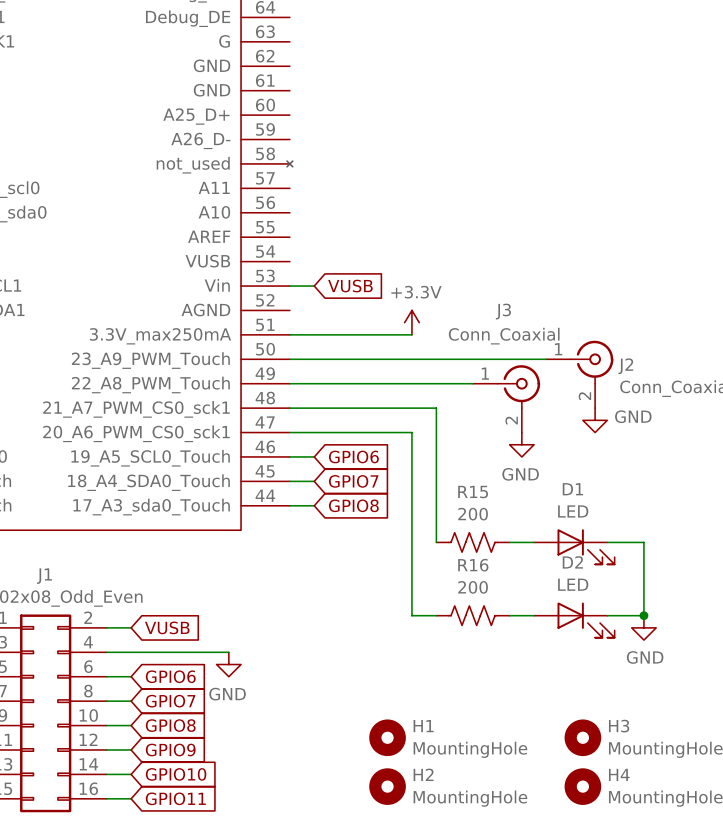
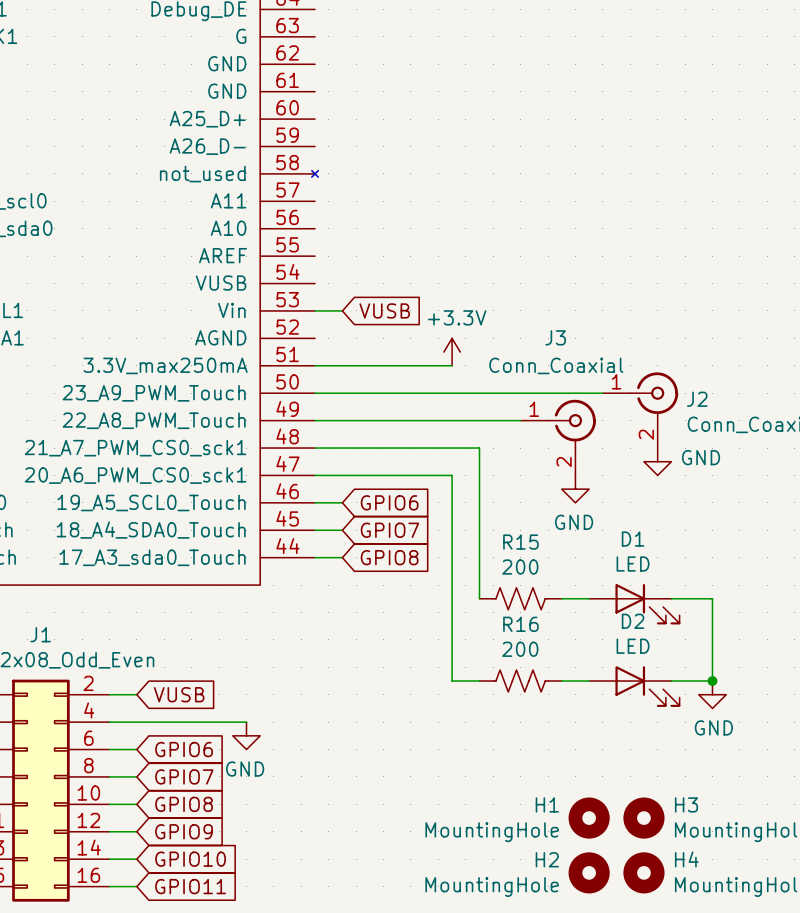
H1 name position: H1 (423, 726) -> H1 (547, 804)
H1 position: (387, 737) -> (589, 818)
H1 value position: MountingHole (470, 749) -> MountingHole (492, 832)
H2 name position: H2 (423, 774) -> H2 (547, 859)
H2 position: (387, 786) -> (589, 872)
H2 value position: MountingHole (470, 798) -> MountingHole (492, 887)

